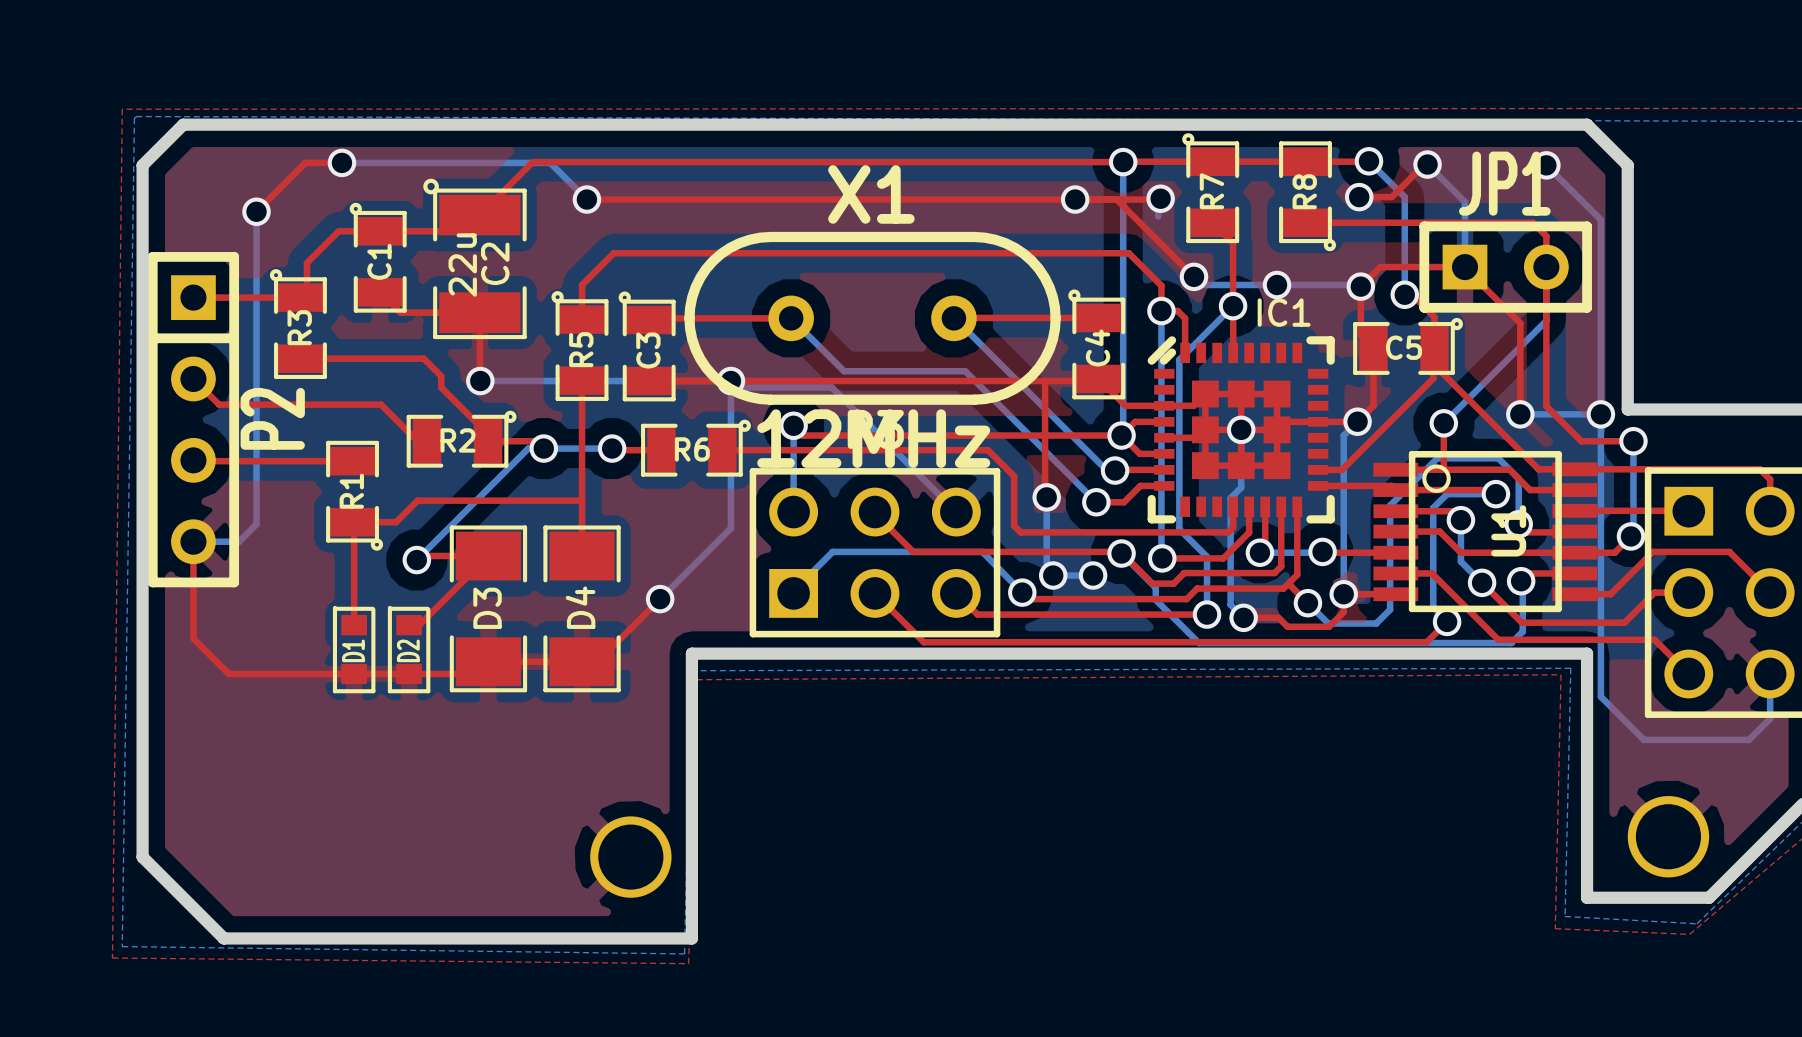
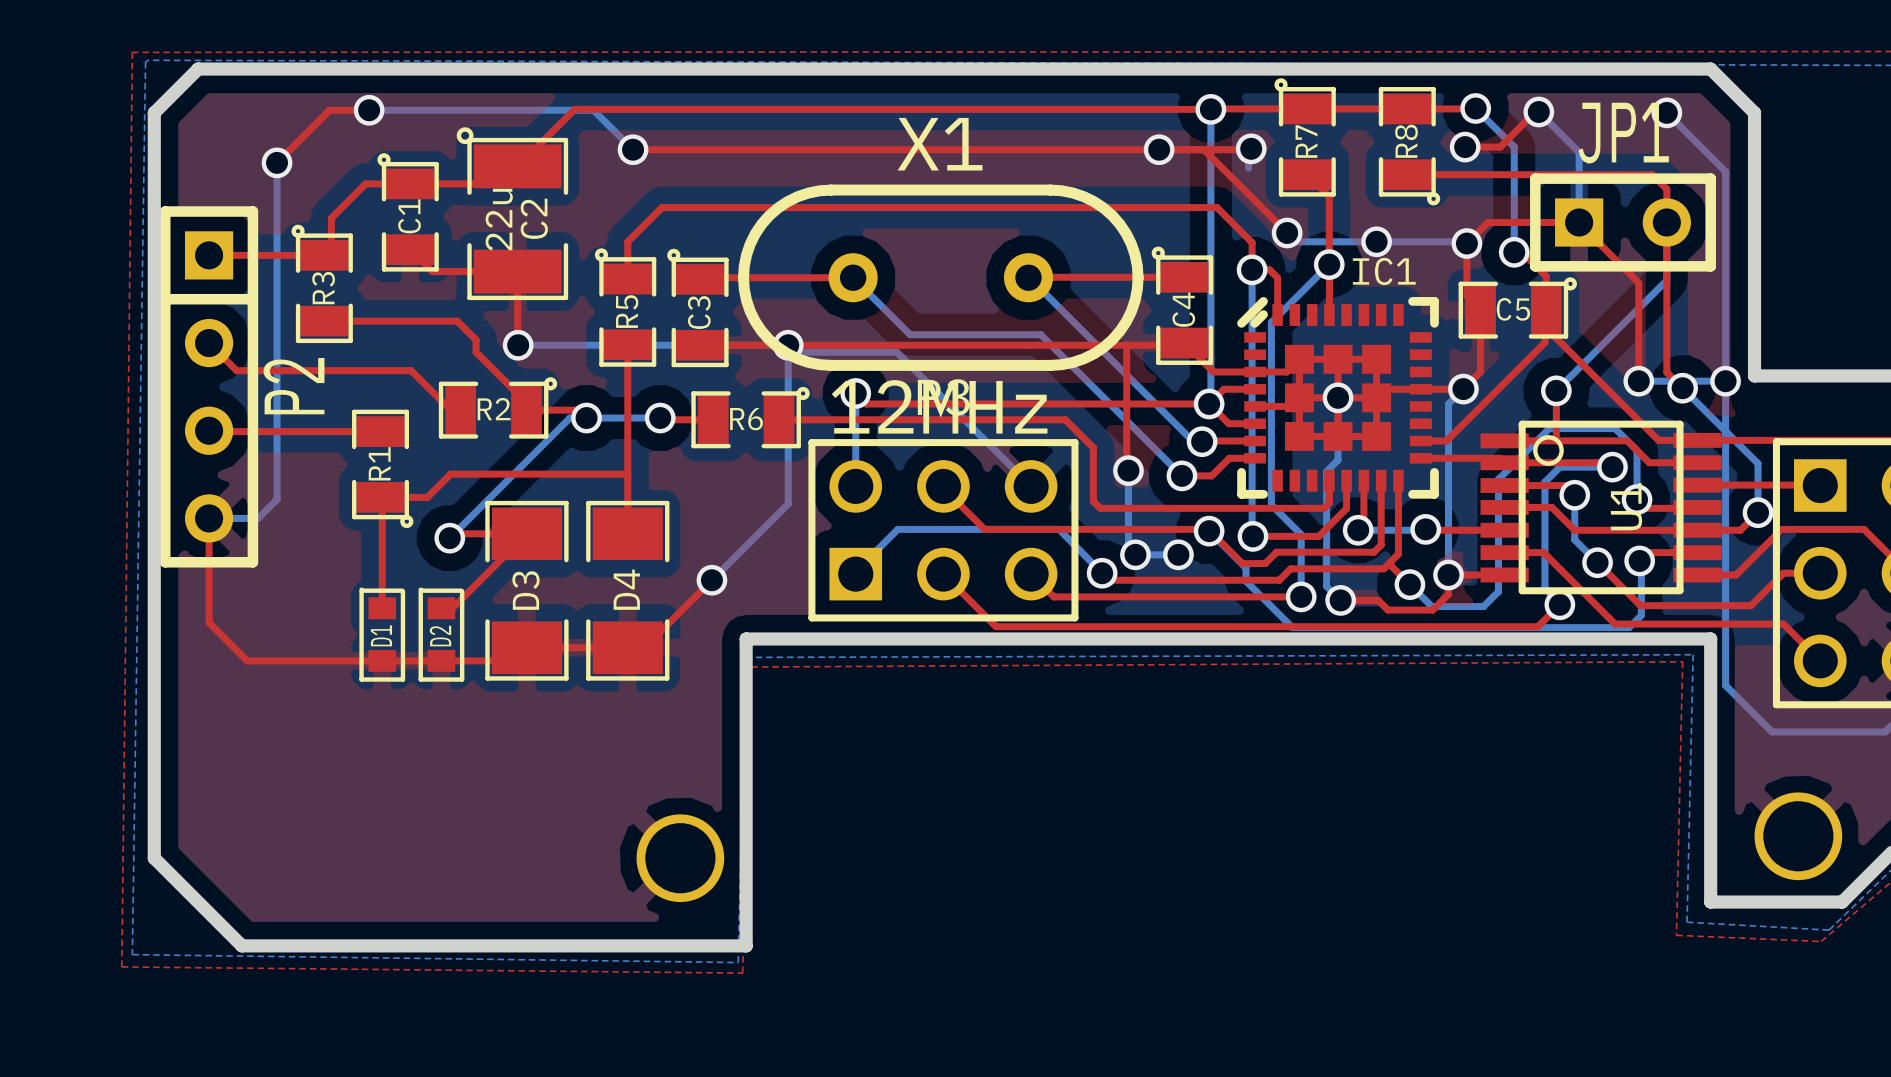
top track: (1561, 420) (1581, 441) (1633, 441) -> none
bottom track: (1633, 441) (1633, 534) (1631, 536) -> (1682, 388) (1758, 463) (1758, 512)
via position: (1633, 441) -> (1682, 388)

